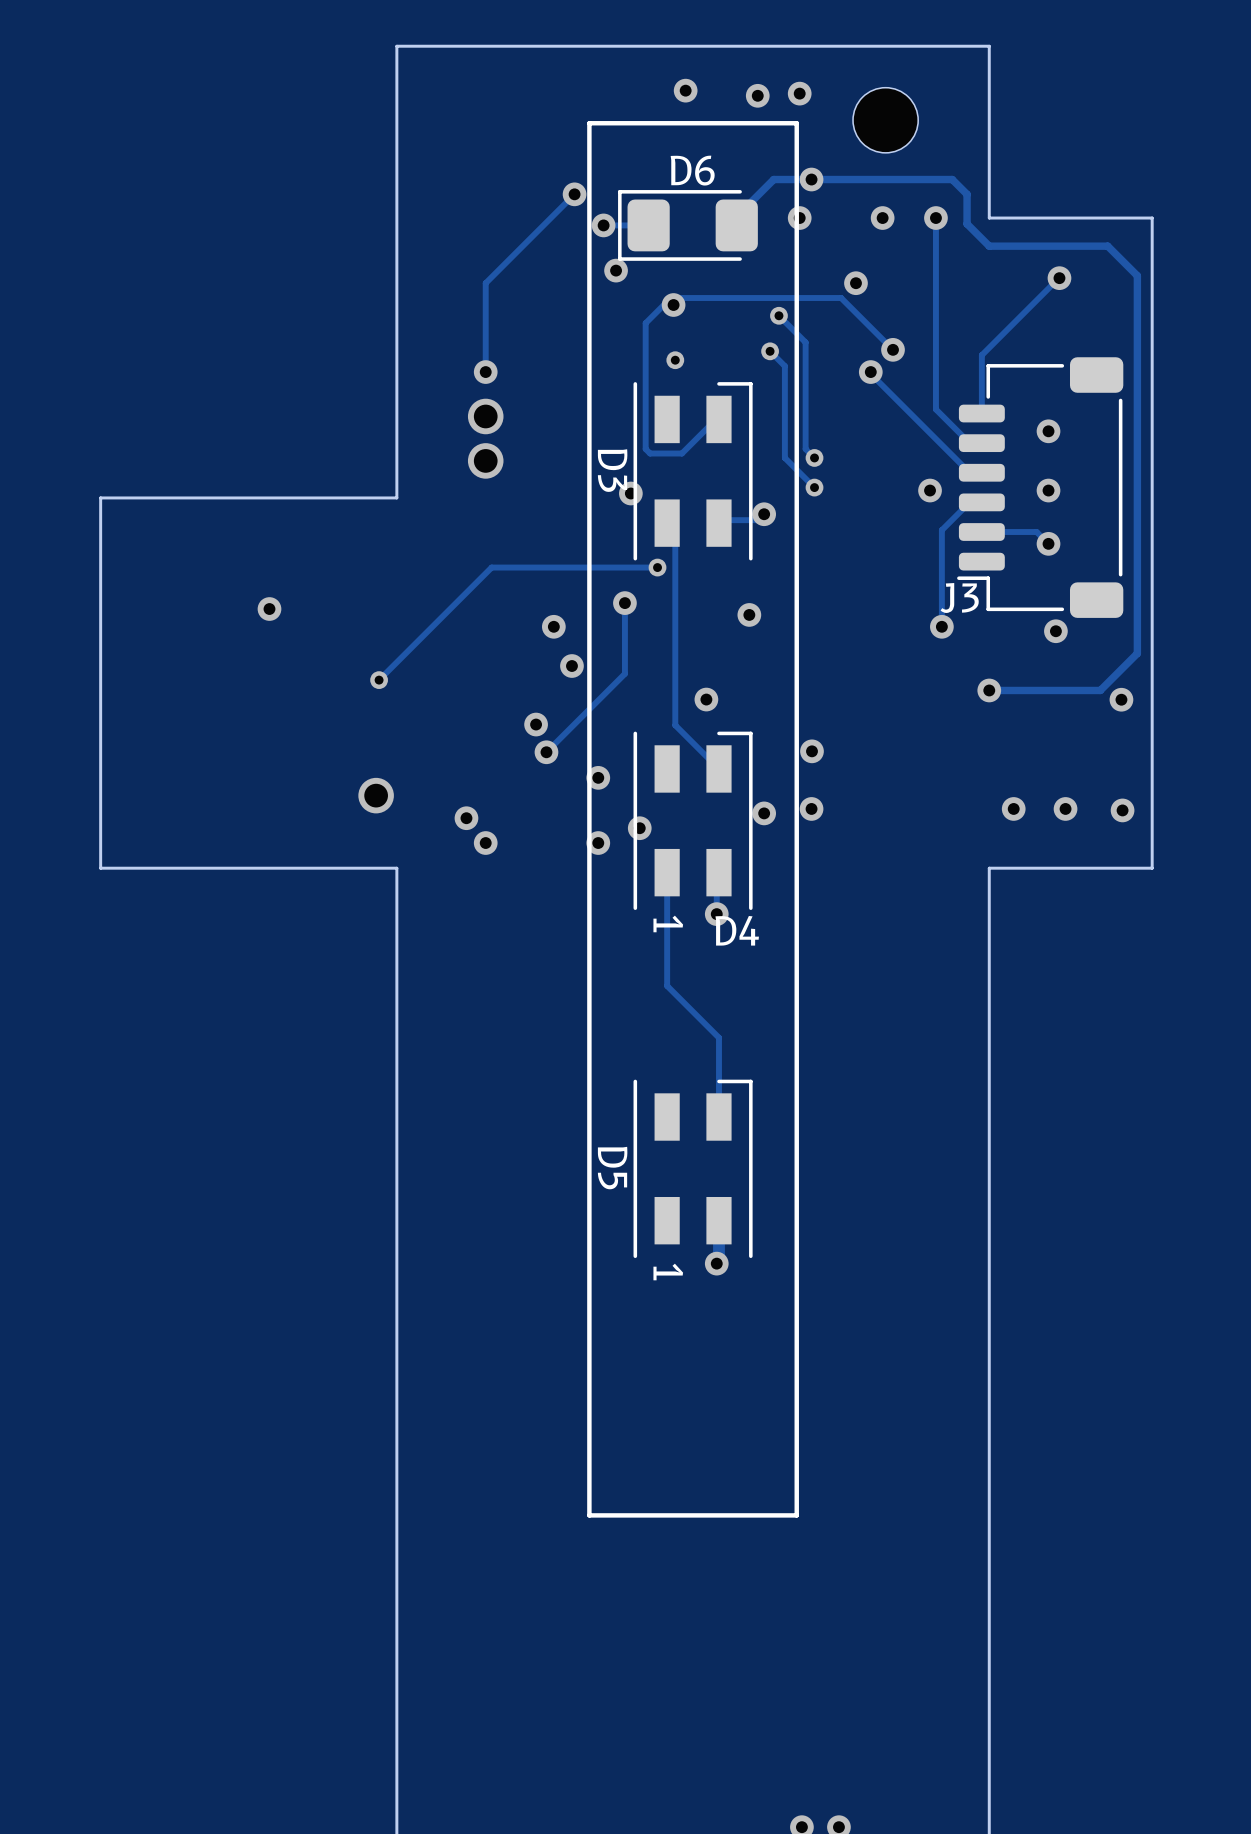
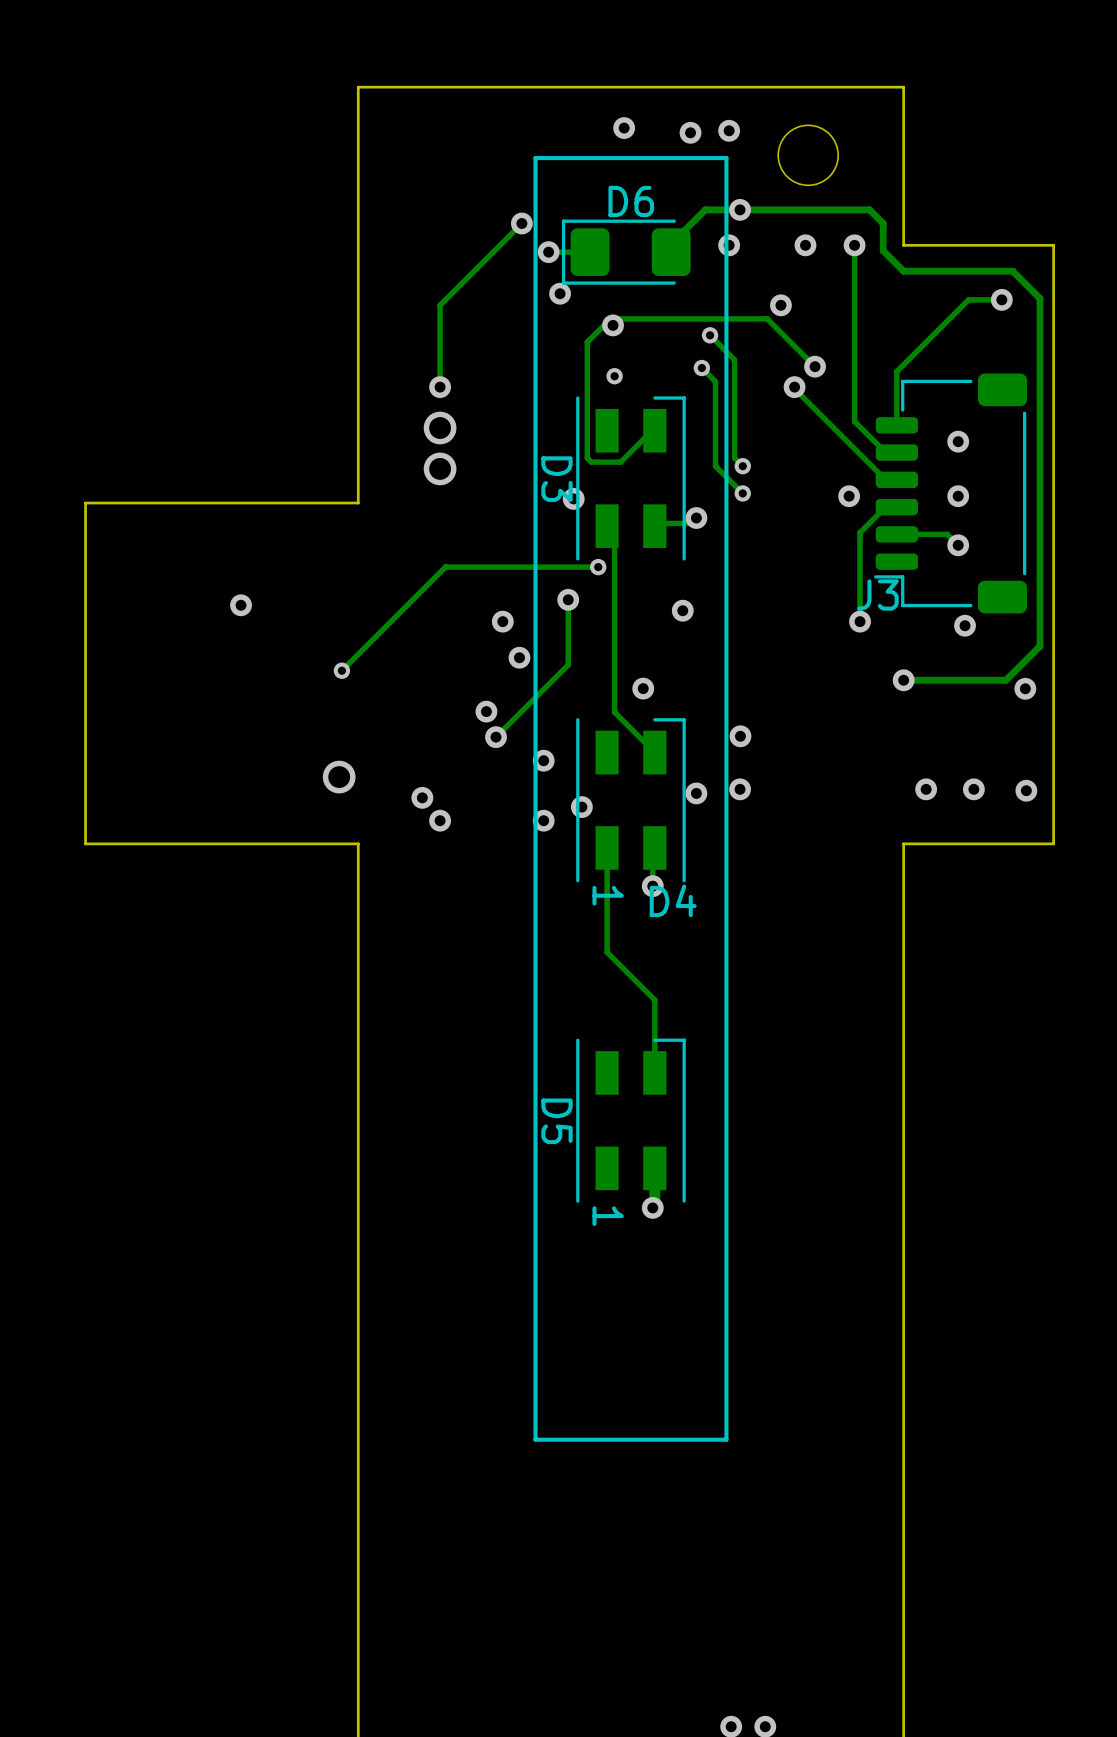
track: none -> (1001, 299) (967, 300)
via position: (1059, 278) -> (1001, 299)

